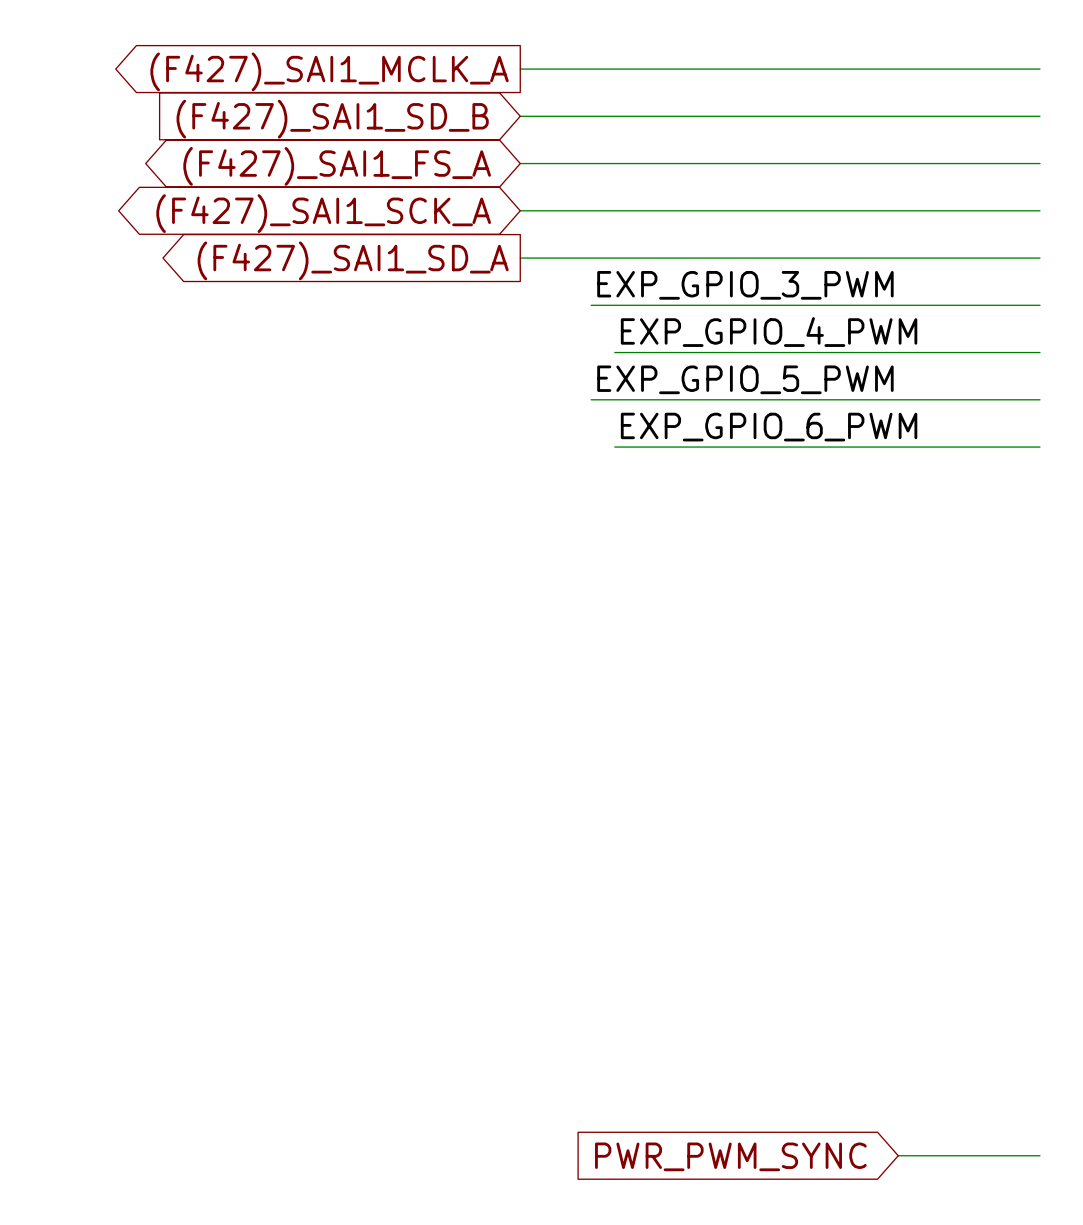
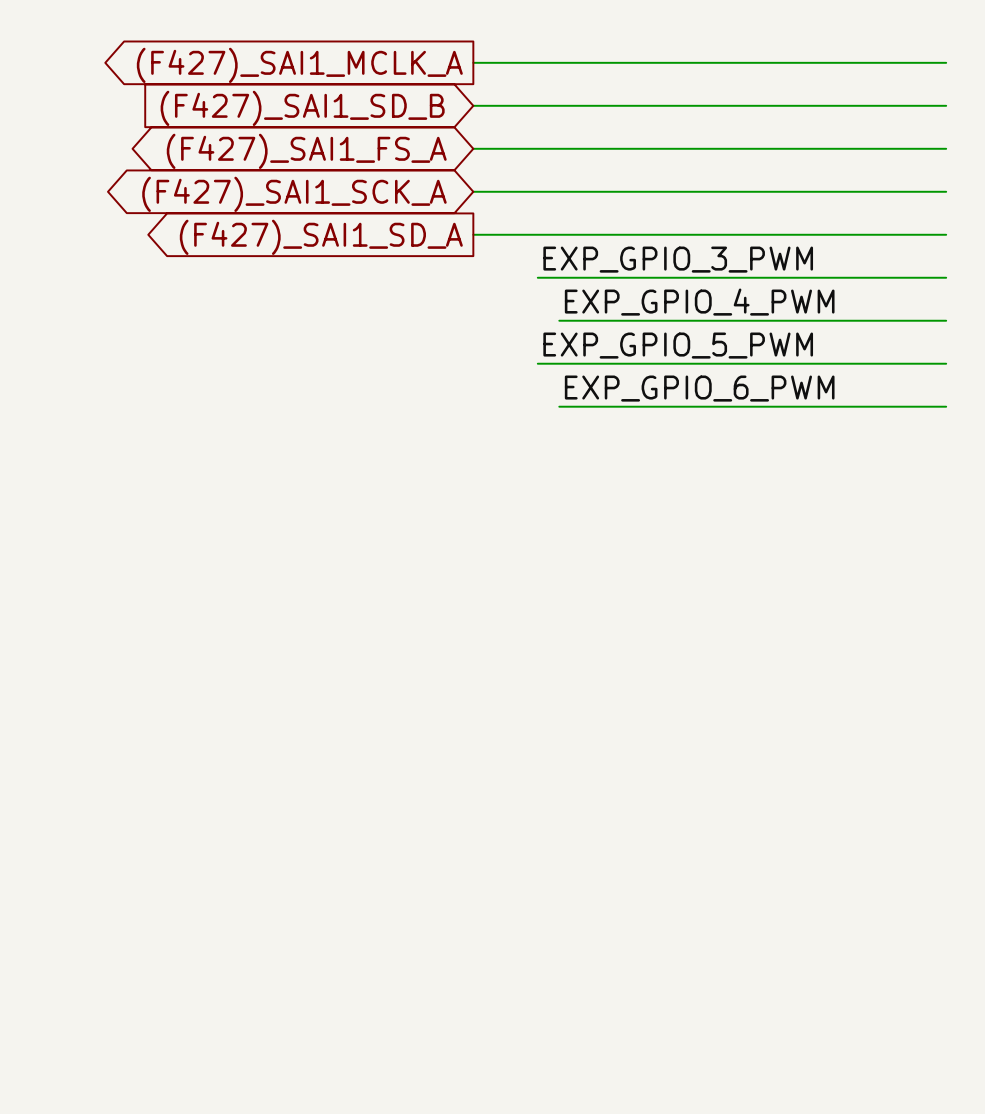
wire: (898, 1155) (1039, 1155) -> none
global label: PWR_PWM_SYNC (730, 1156) -> none

